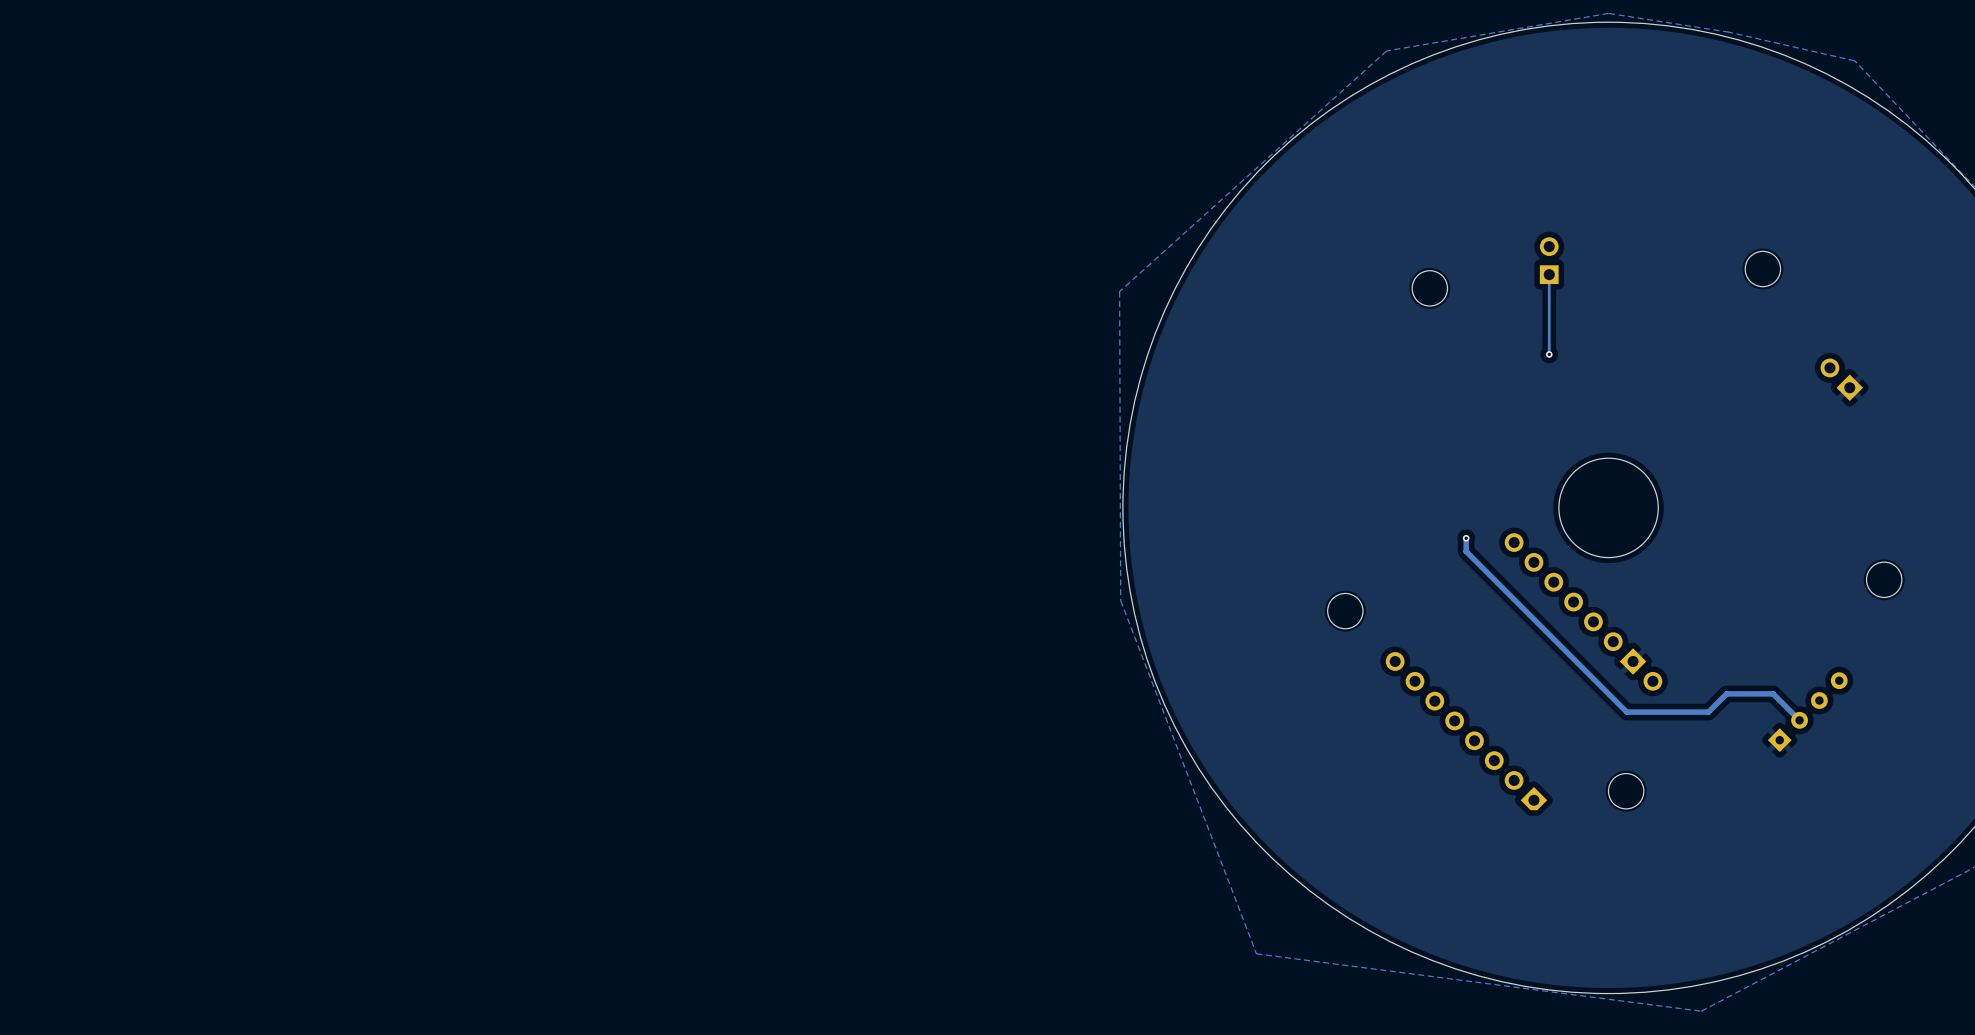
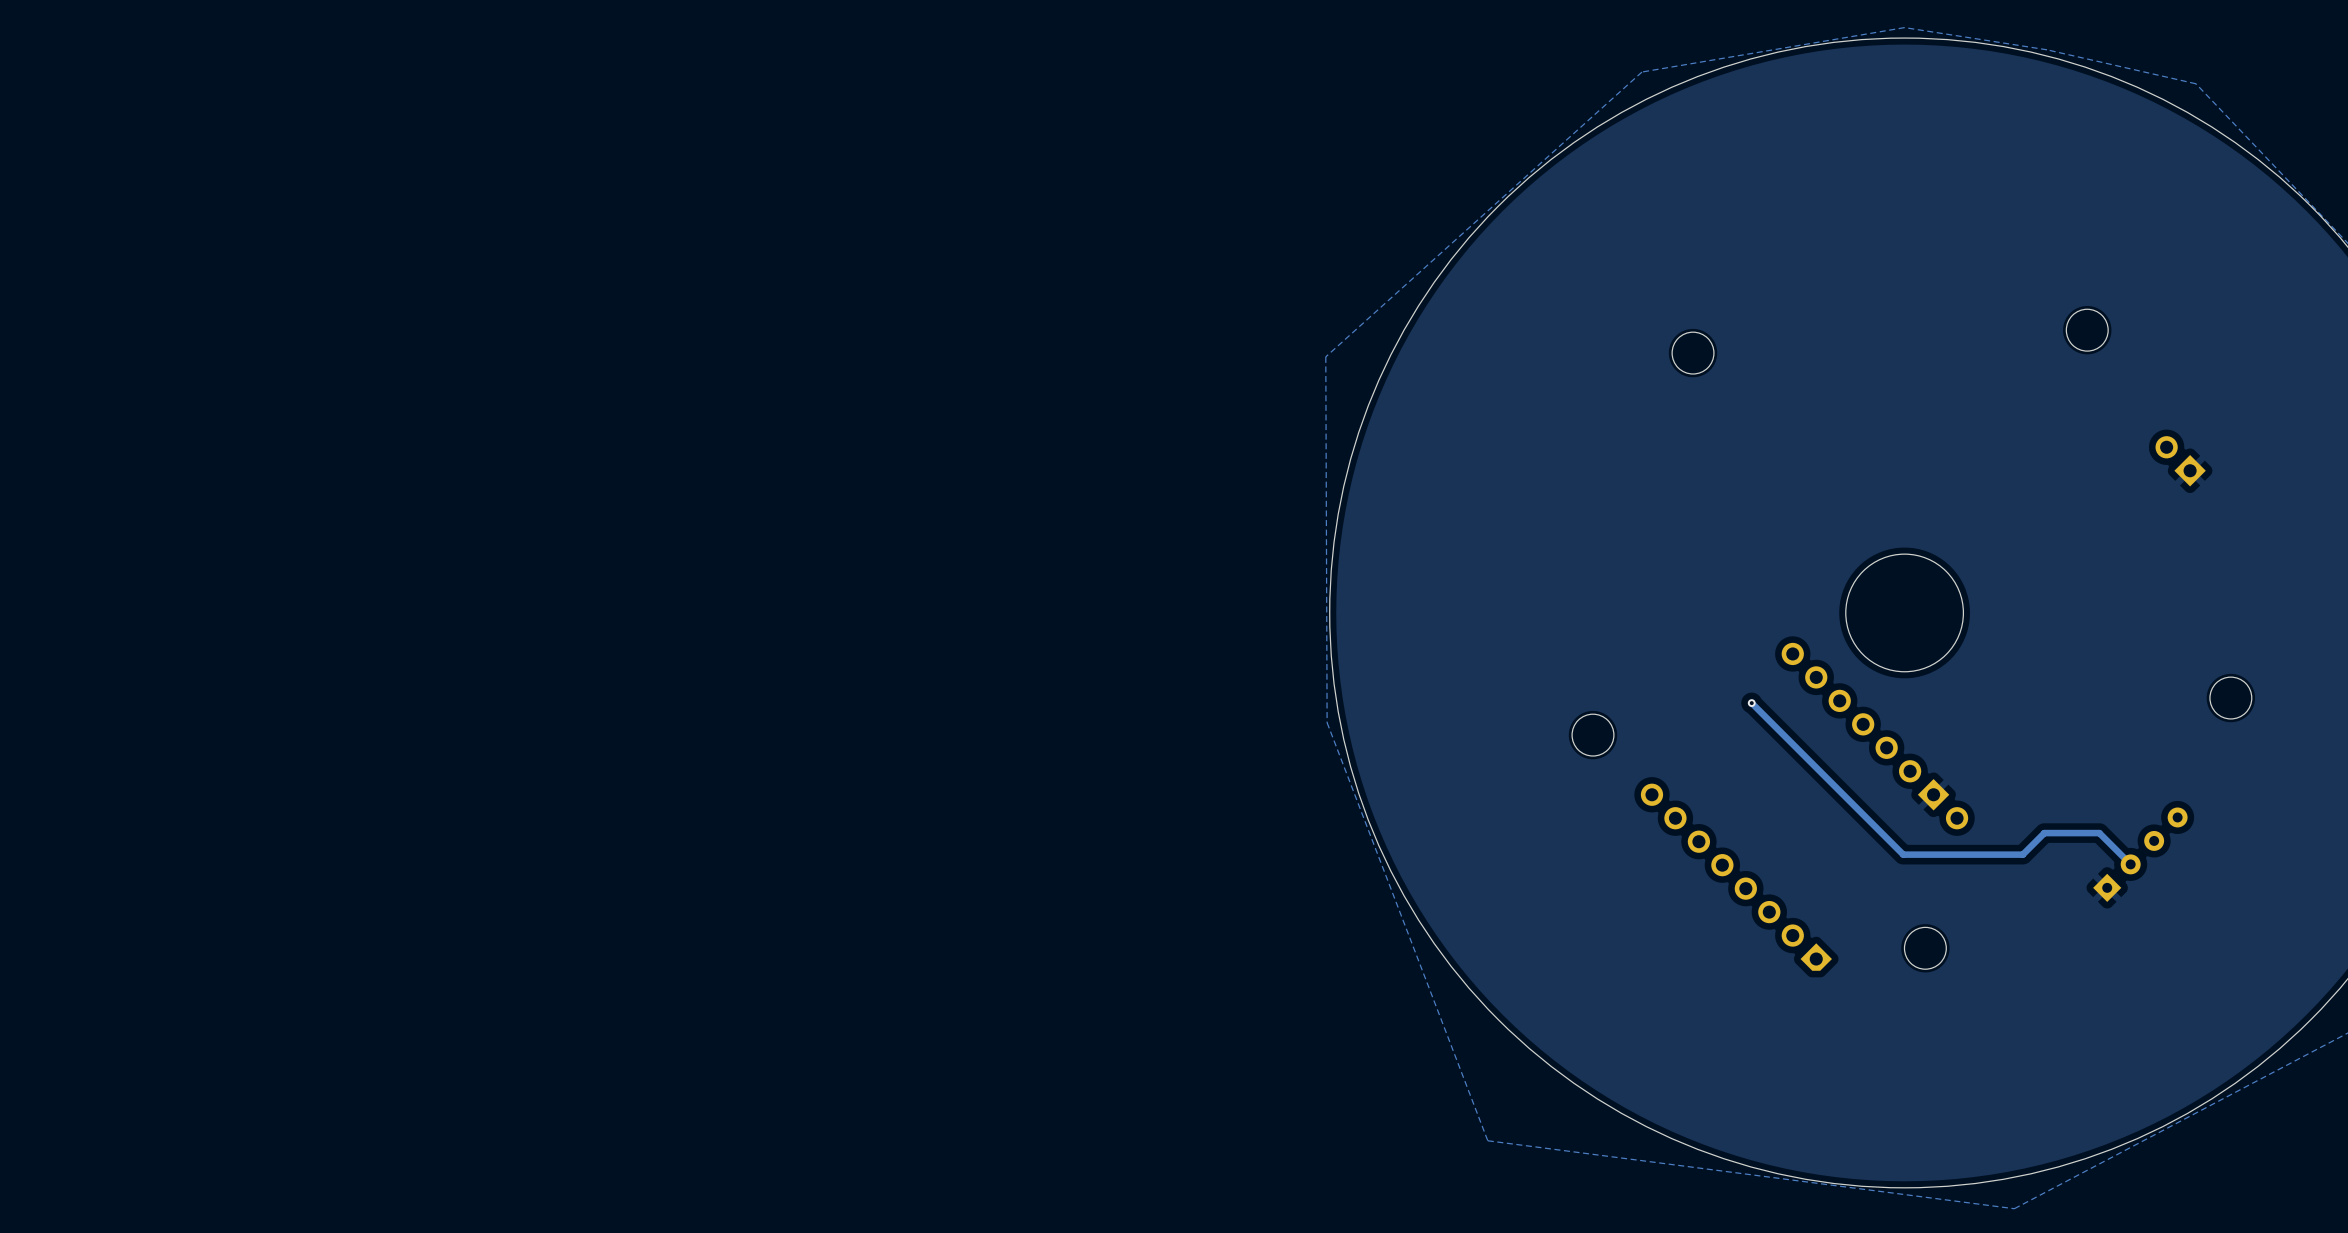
part: (1549, 260) -> none
track: (1549, 274) (1549, 354) -> none
via: (1549, 354) -> none
track: (1466, 538) (1466, 551) (1626, 712) -> (1751, 703) (1903, 854) (1926, 854)
via position: (1466, 538) -> (1751, 703)

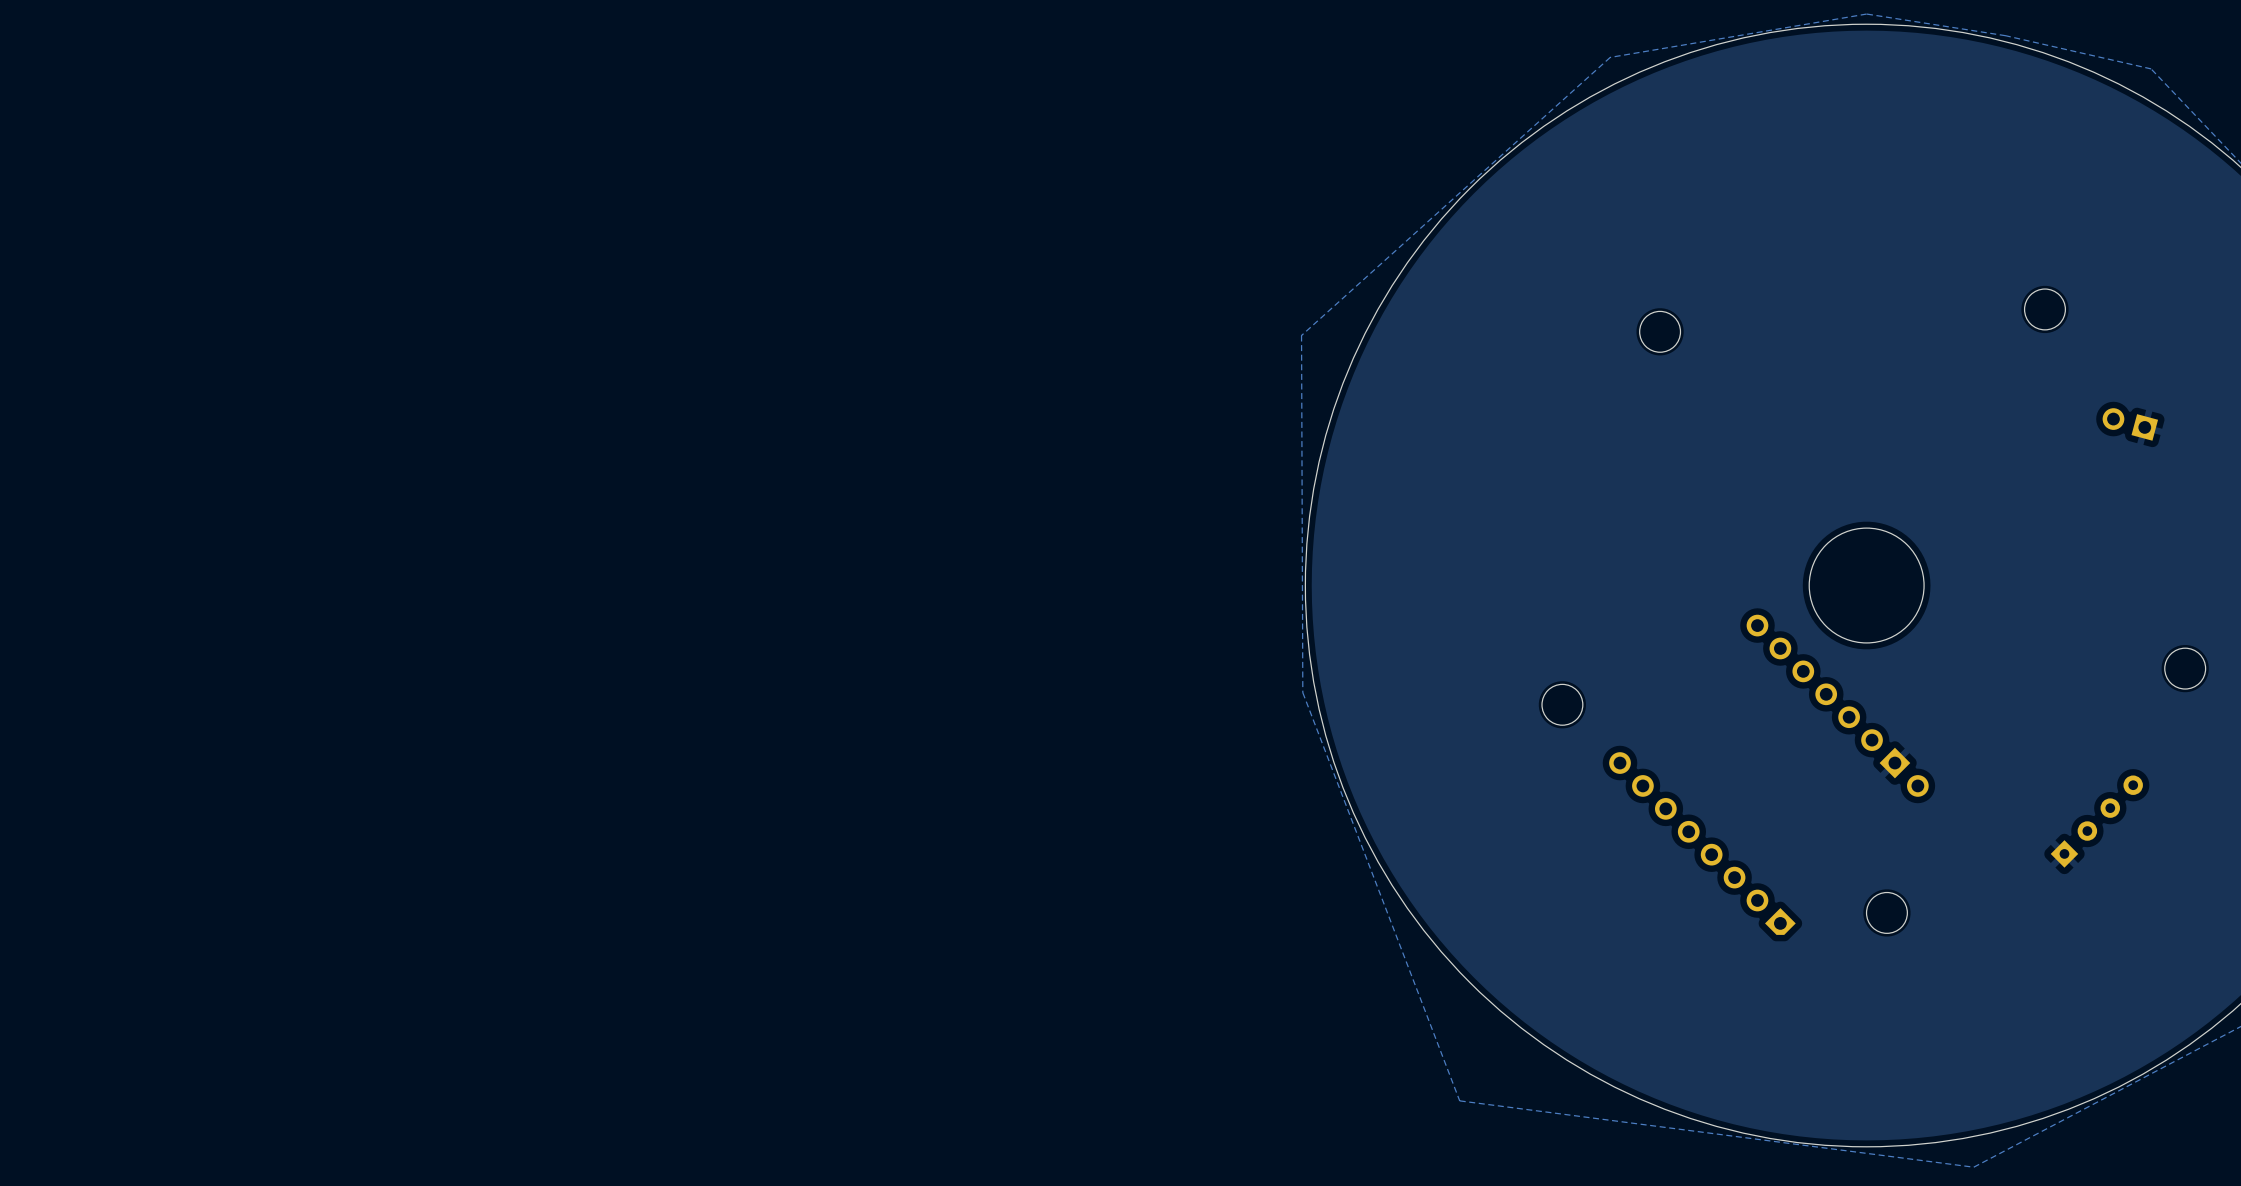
part: none -> (2130, 424)
part: (2180, 461) -> none
track: (1751, 703) (1903, 854) (2022, 854) (2044, 833) (2099, 833) (2130, 864) -> none
via: (1751, 703) -> none

